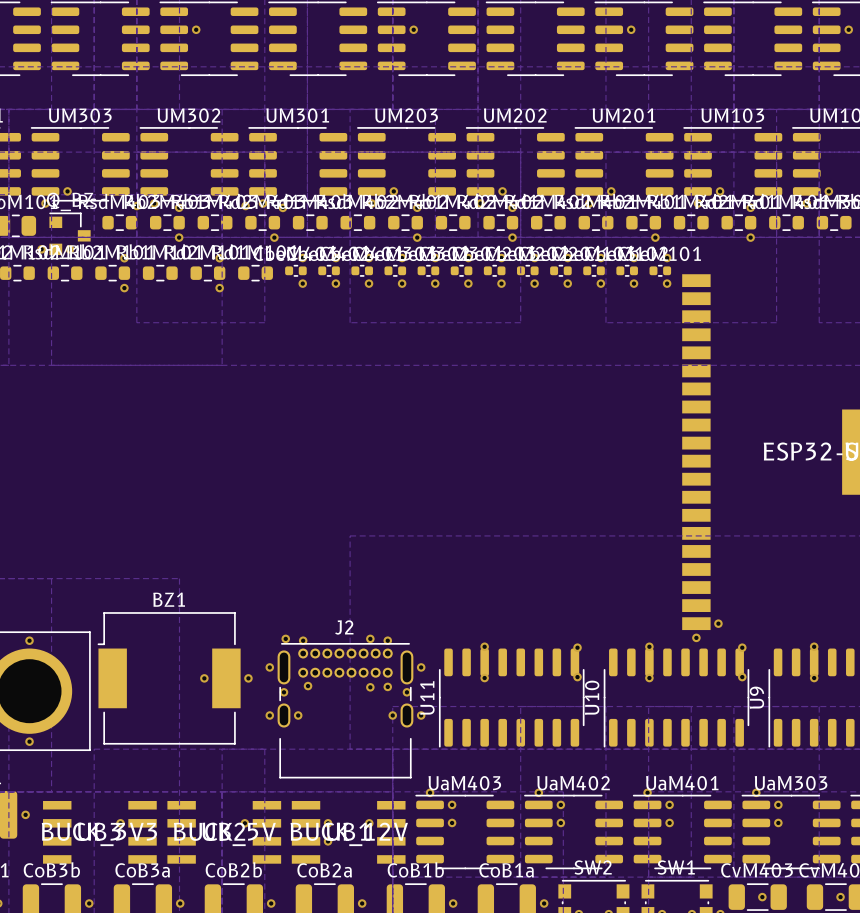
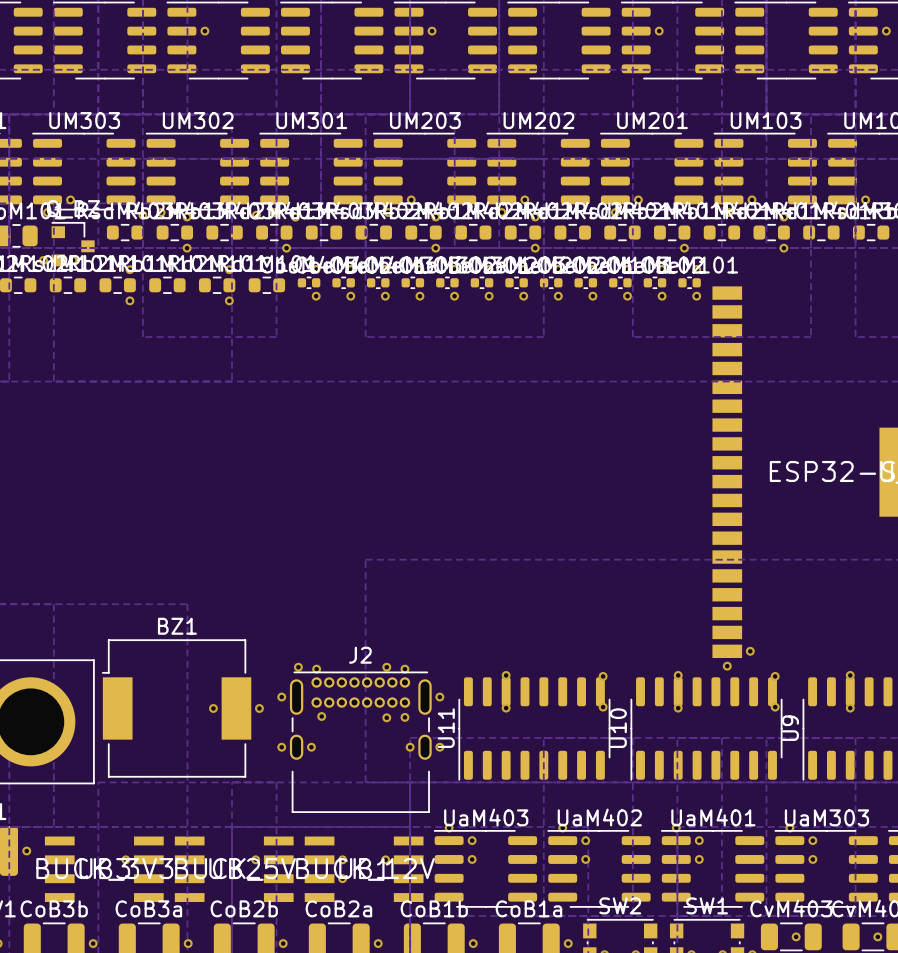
via: (29, 640) -> none
via: (283, 692) -> none
via: (406, 692) -> none
via: (29, 741) -> none

